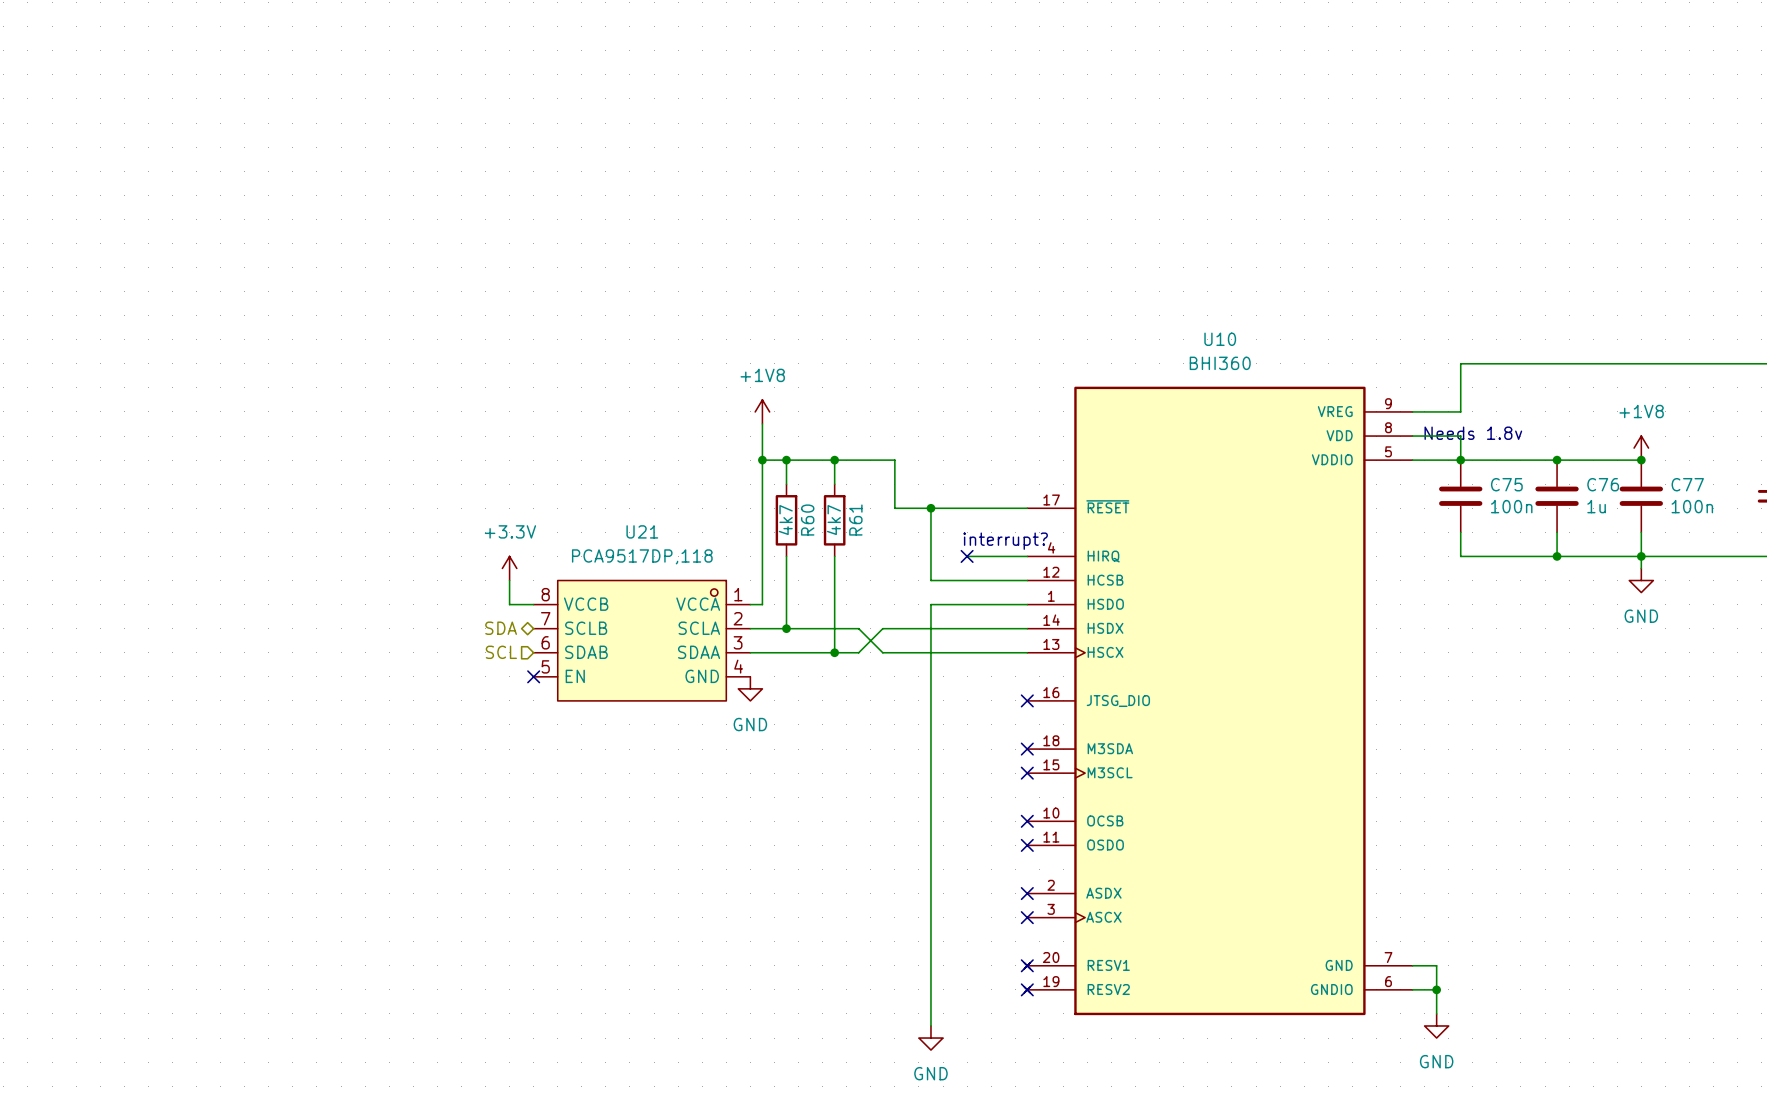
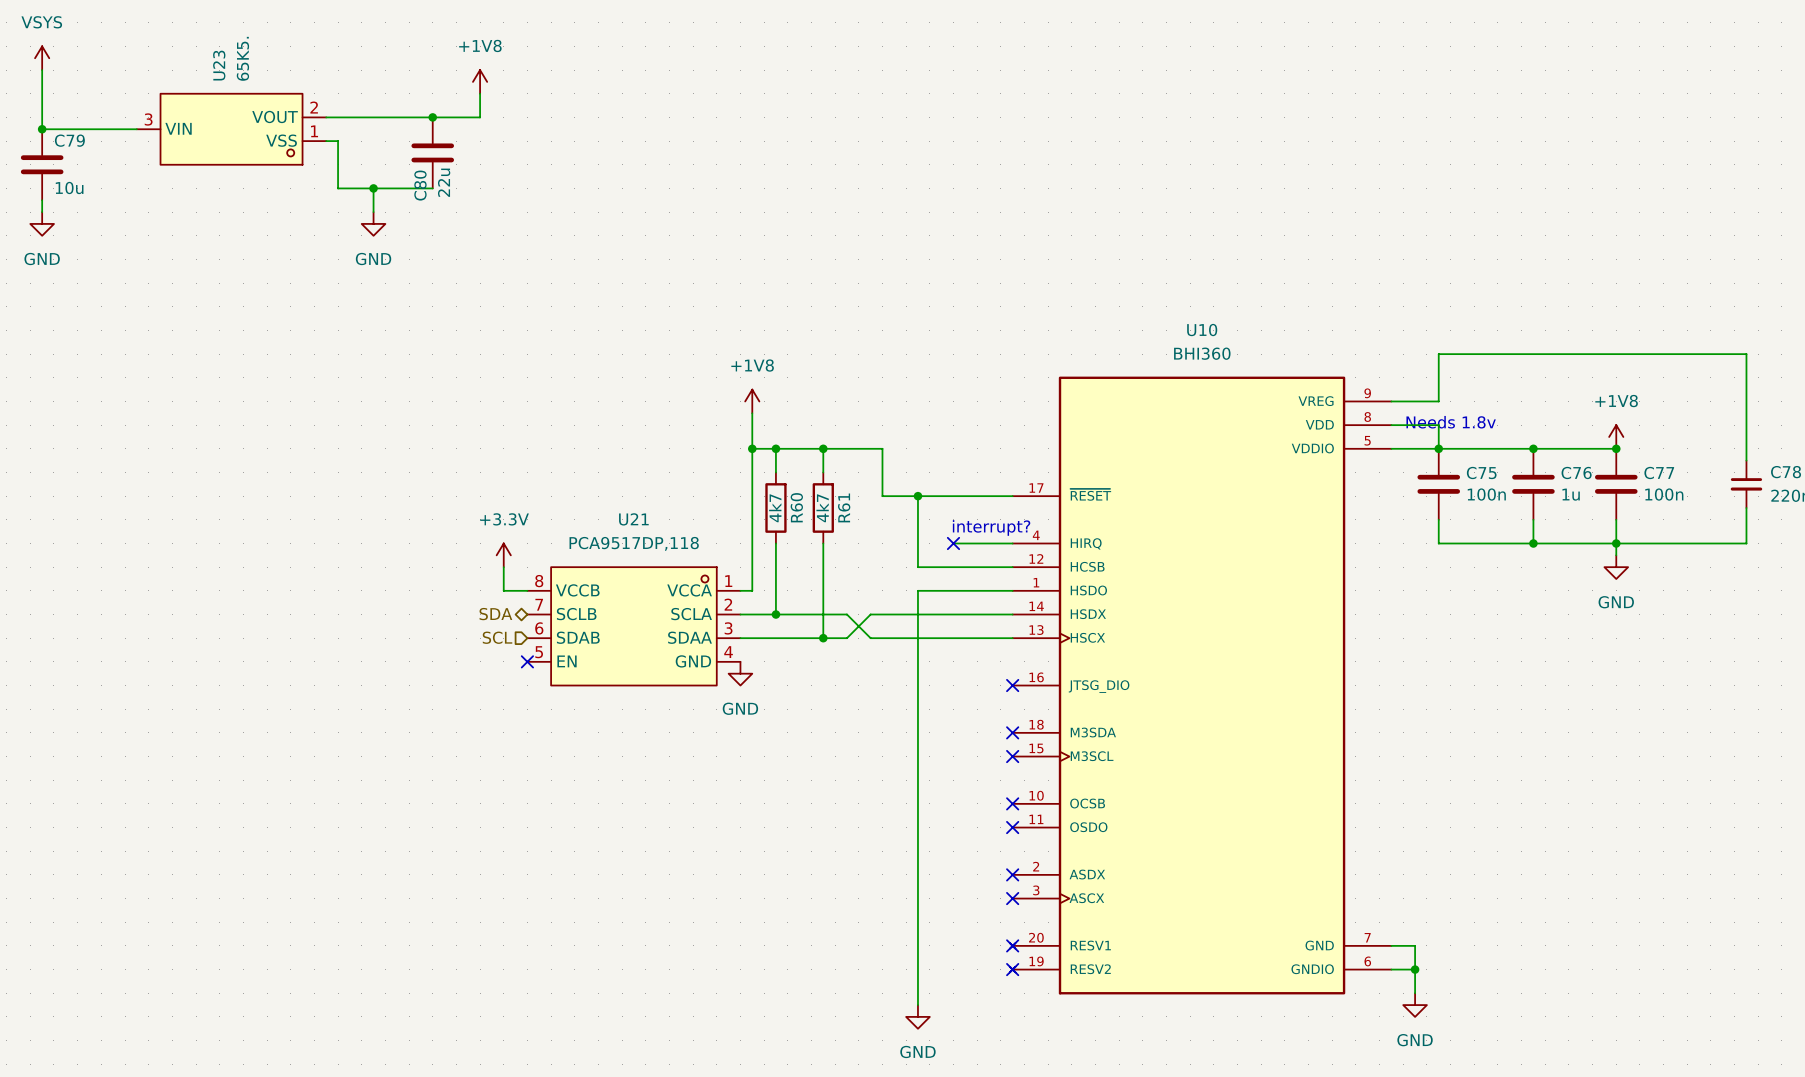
power symbol: none -> VSYS (42, 58)
wire: none -> (42, 70) (42, 129) (136, 129)
power symbol: none -> +1V8 (480, 81)
wire: none -> (480, 93) (480, 117) (326, 117)
junction: none -> (432, 117)
junction: none -> (42, 129)
U23: none -> 65K5. (231, 129)
wire: none -> (326, 141) (338, 141) (338, 188) (432, 188)
C80: none -> 22u (432, 152)
C79: none -> 10u (42, 164)
wire: none -> (373, 188) (373, 212)
junction: none -> (373, 188)
wire: none -> (42, 200) (42, 212)
power symbol: none -> GND (42, 223)
power symbol: none -> GND (373, 223)

